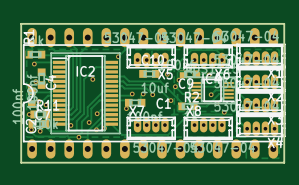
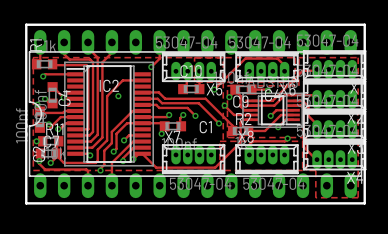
C10 value: 10uf (155, 87) -> none

